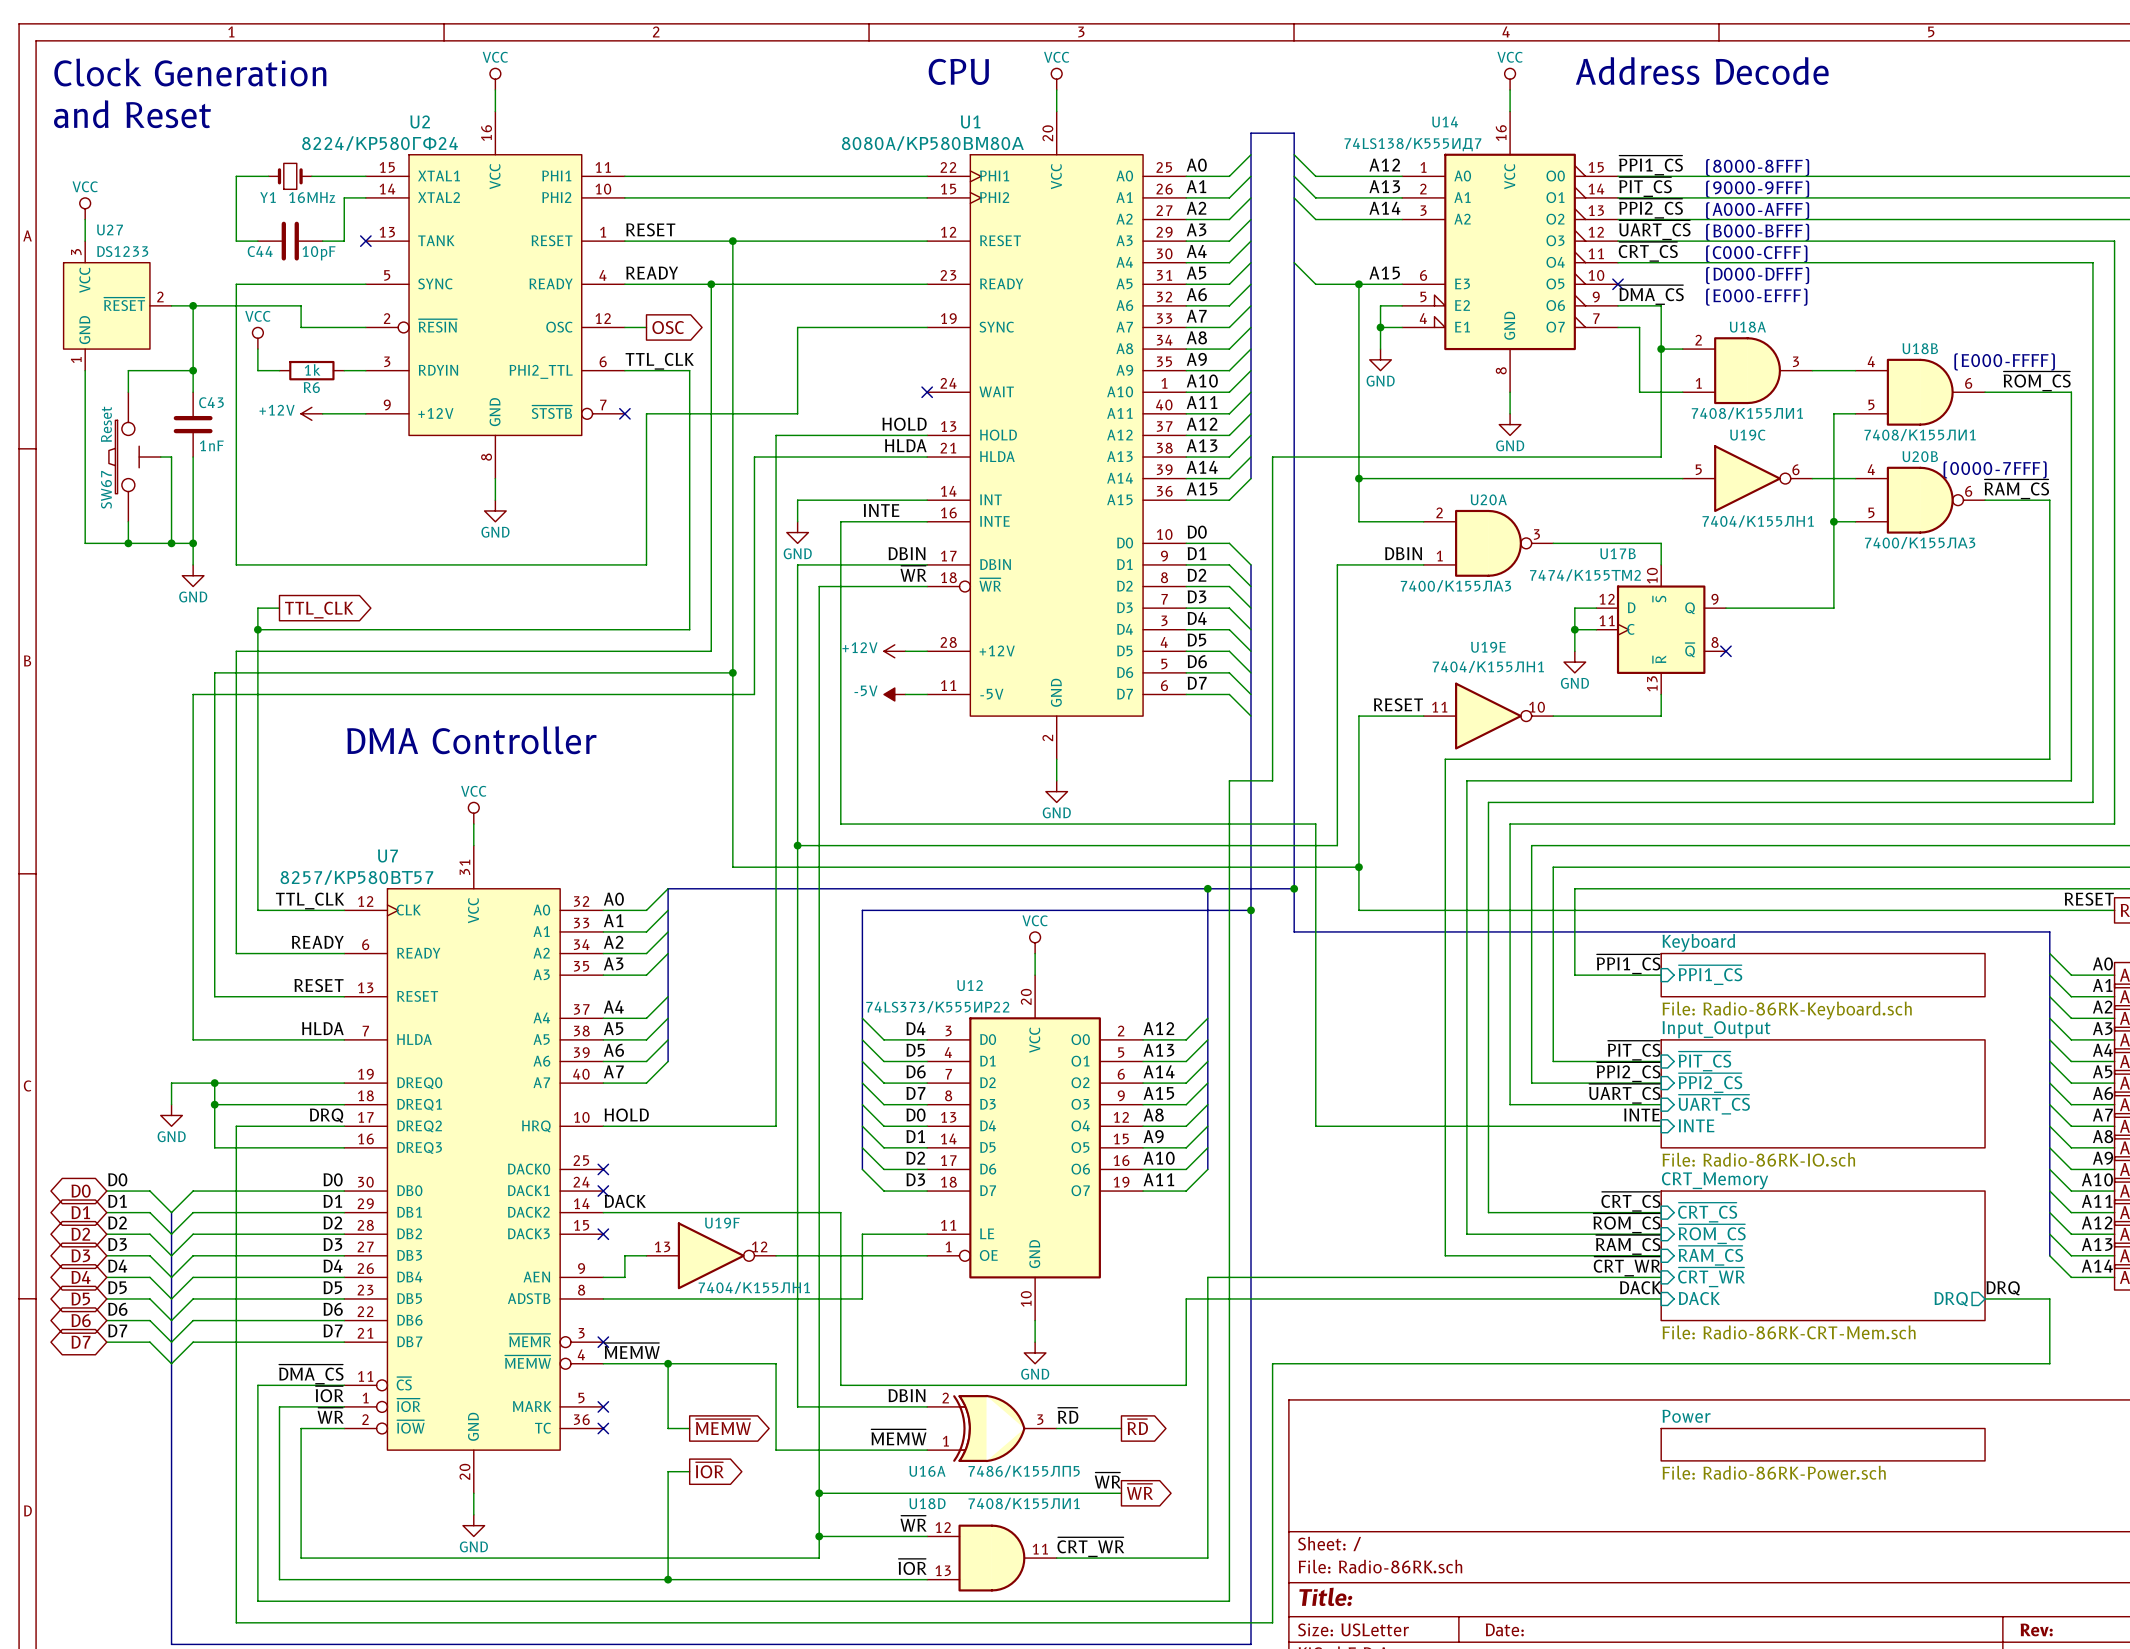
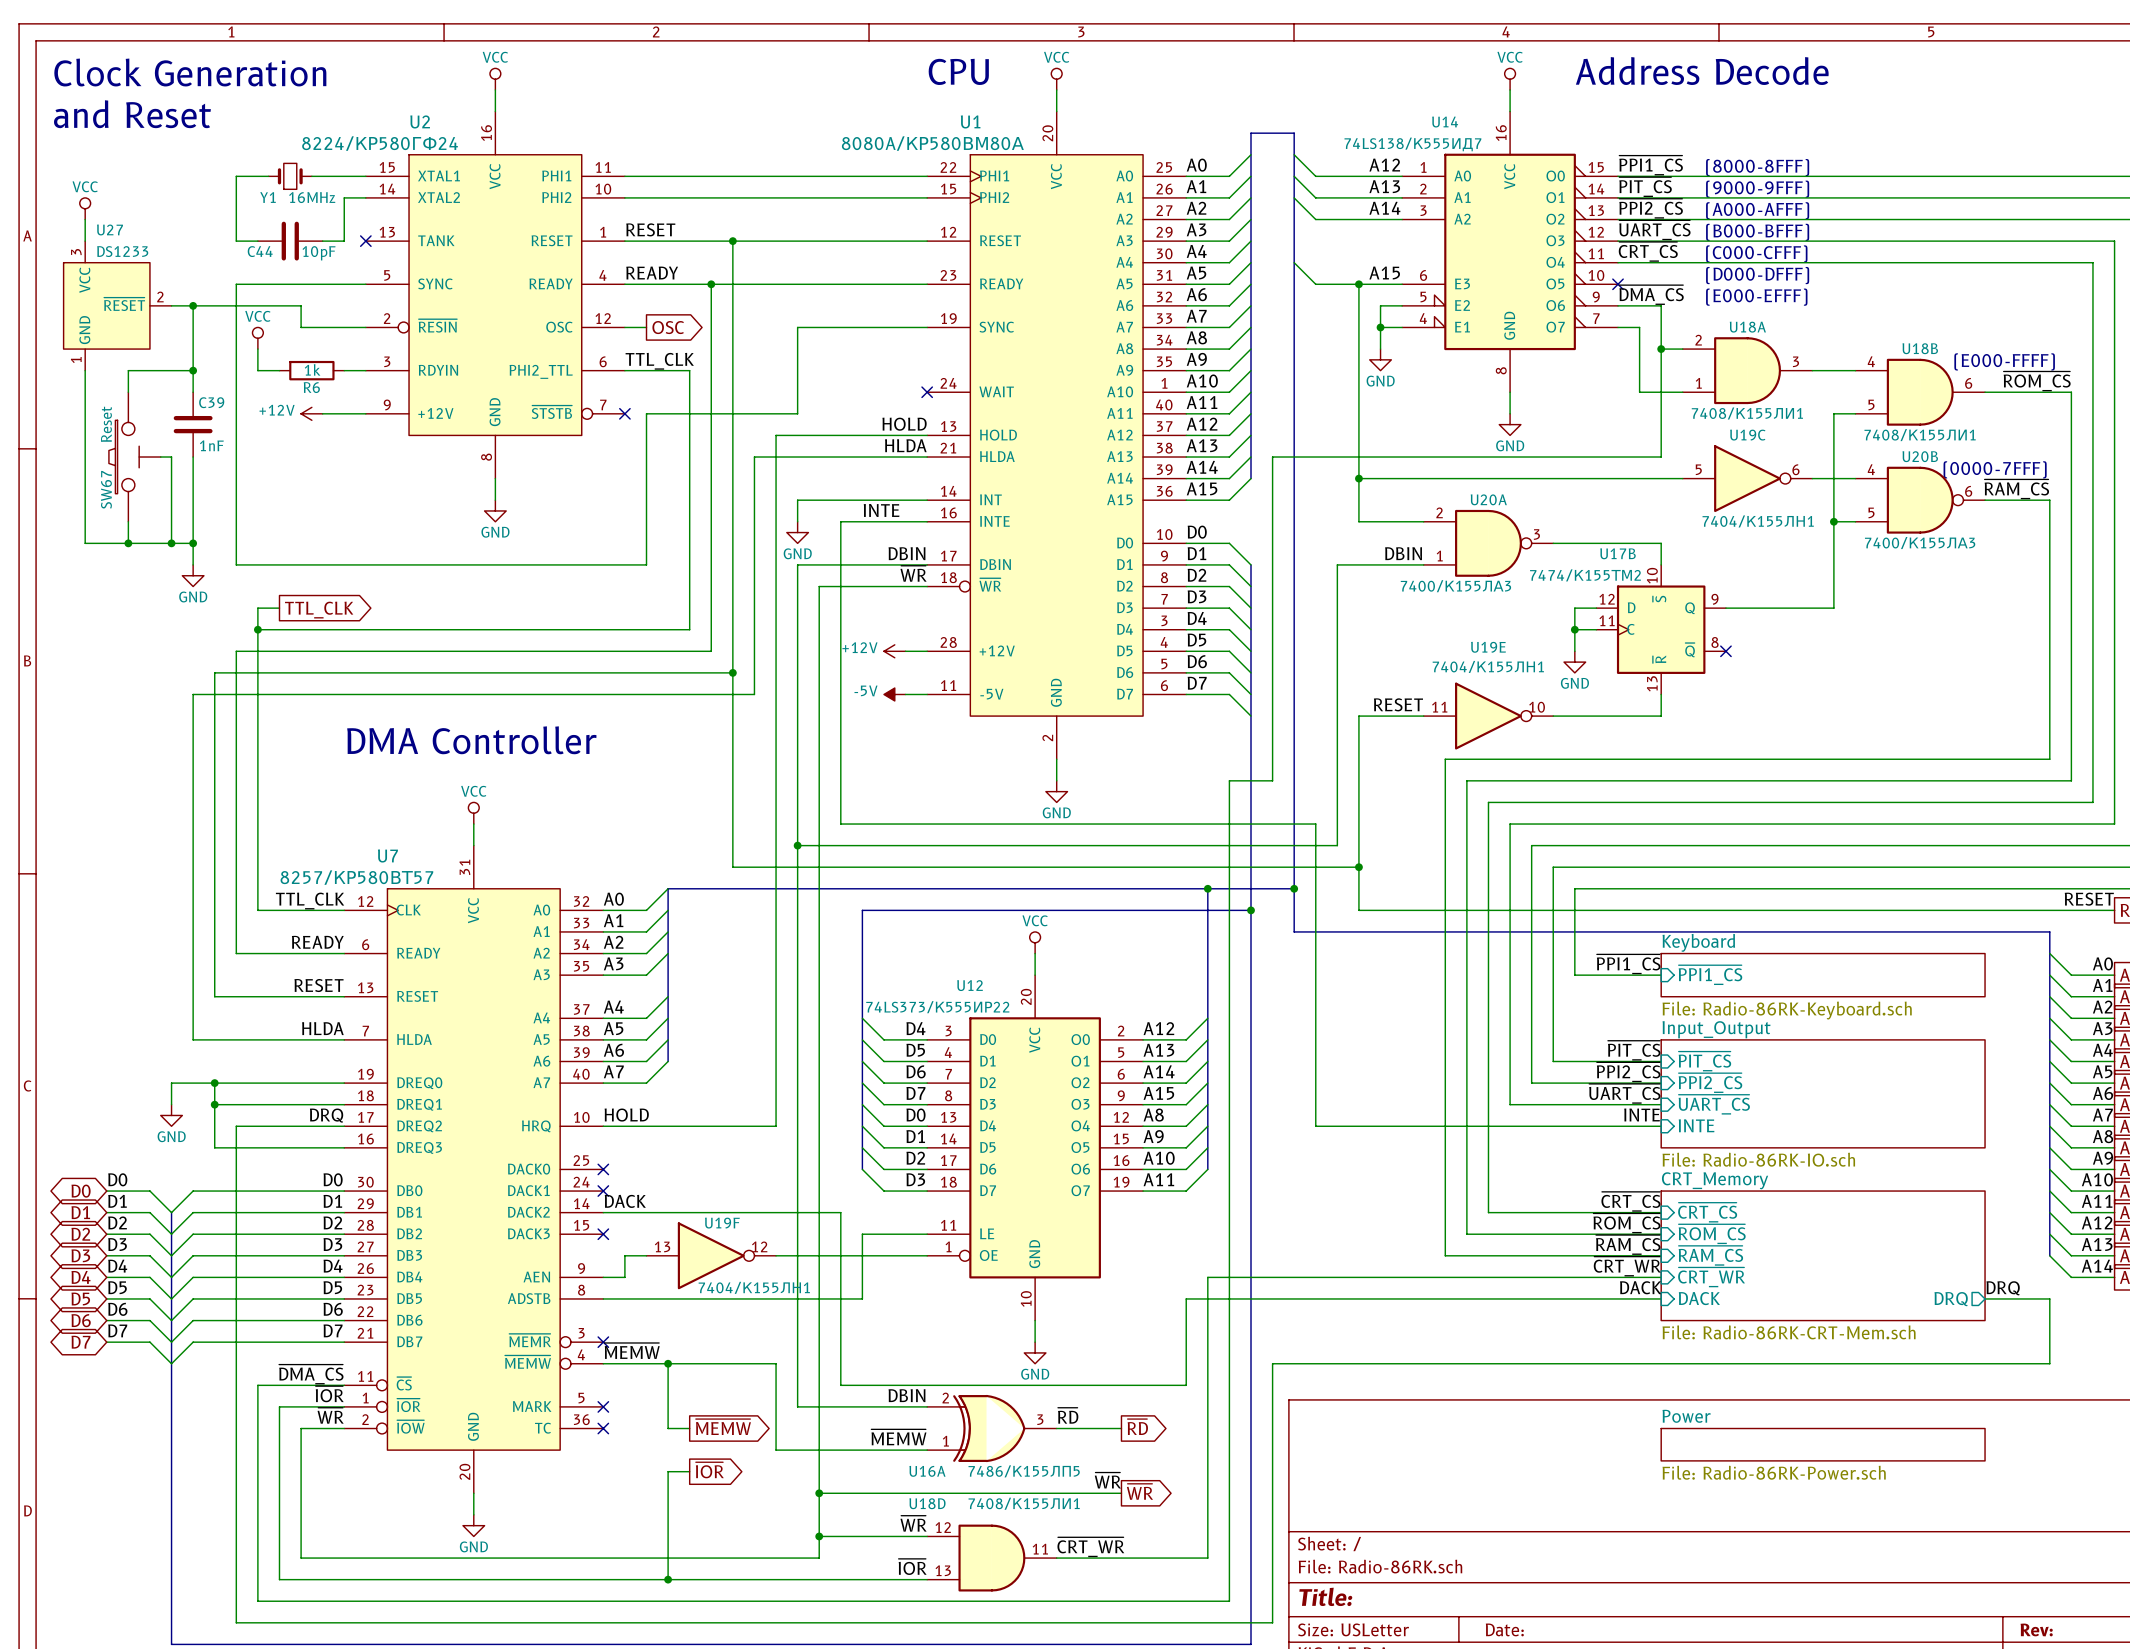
C43 name: C43 (211, 402) -> C39 (211, 402)

